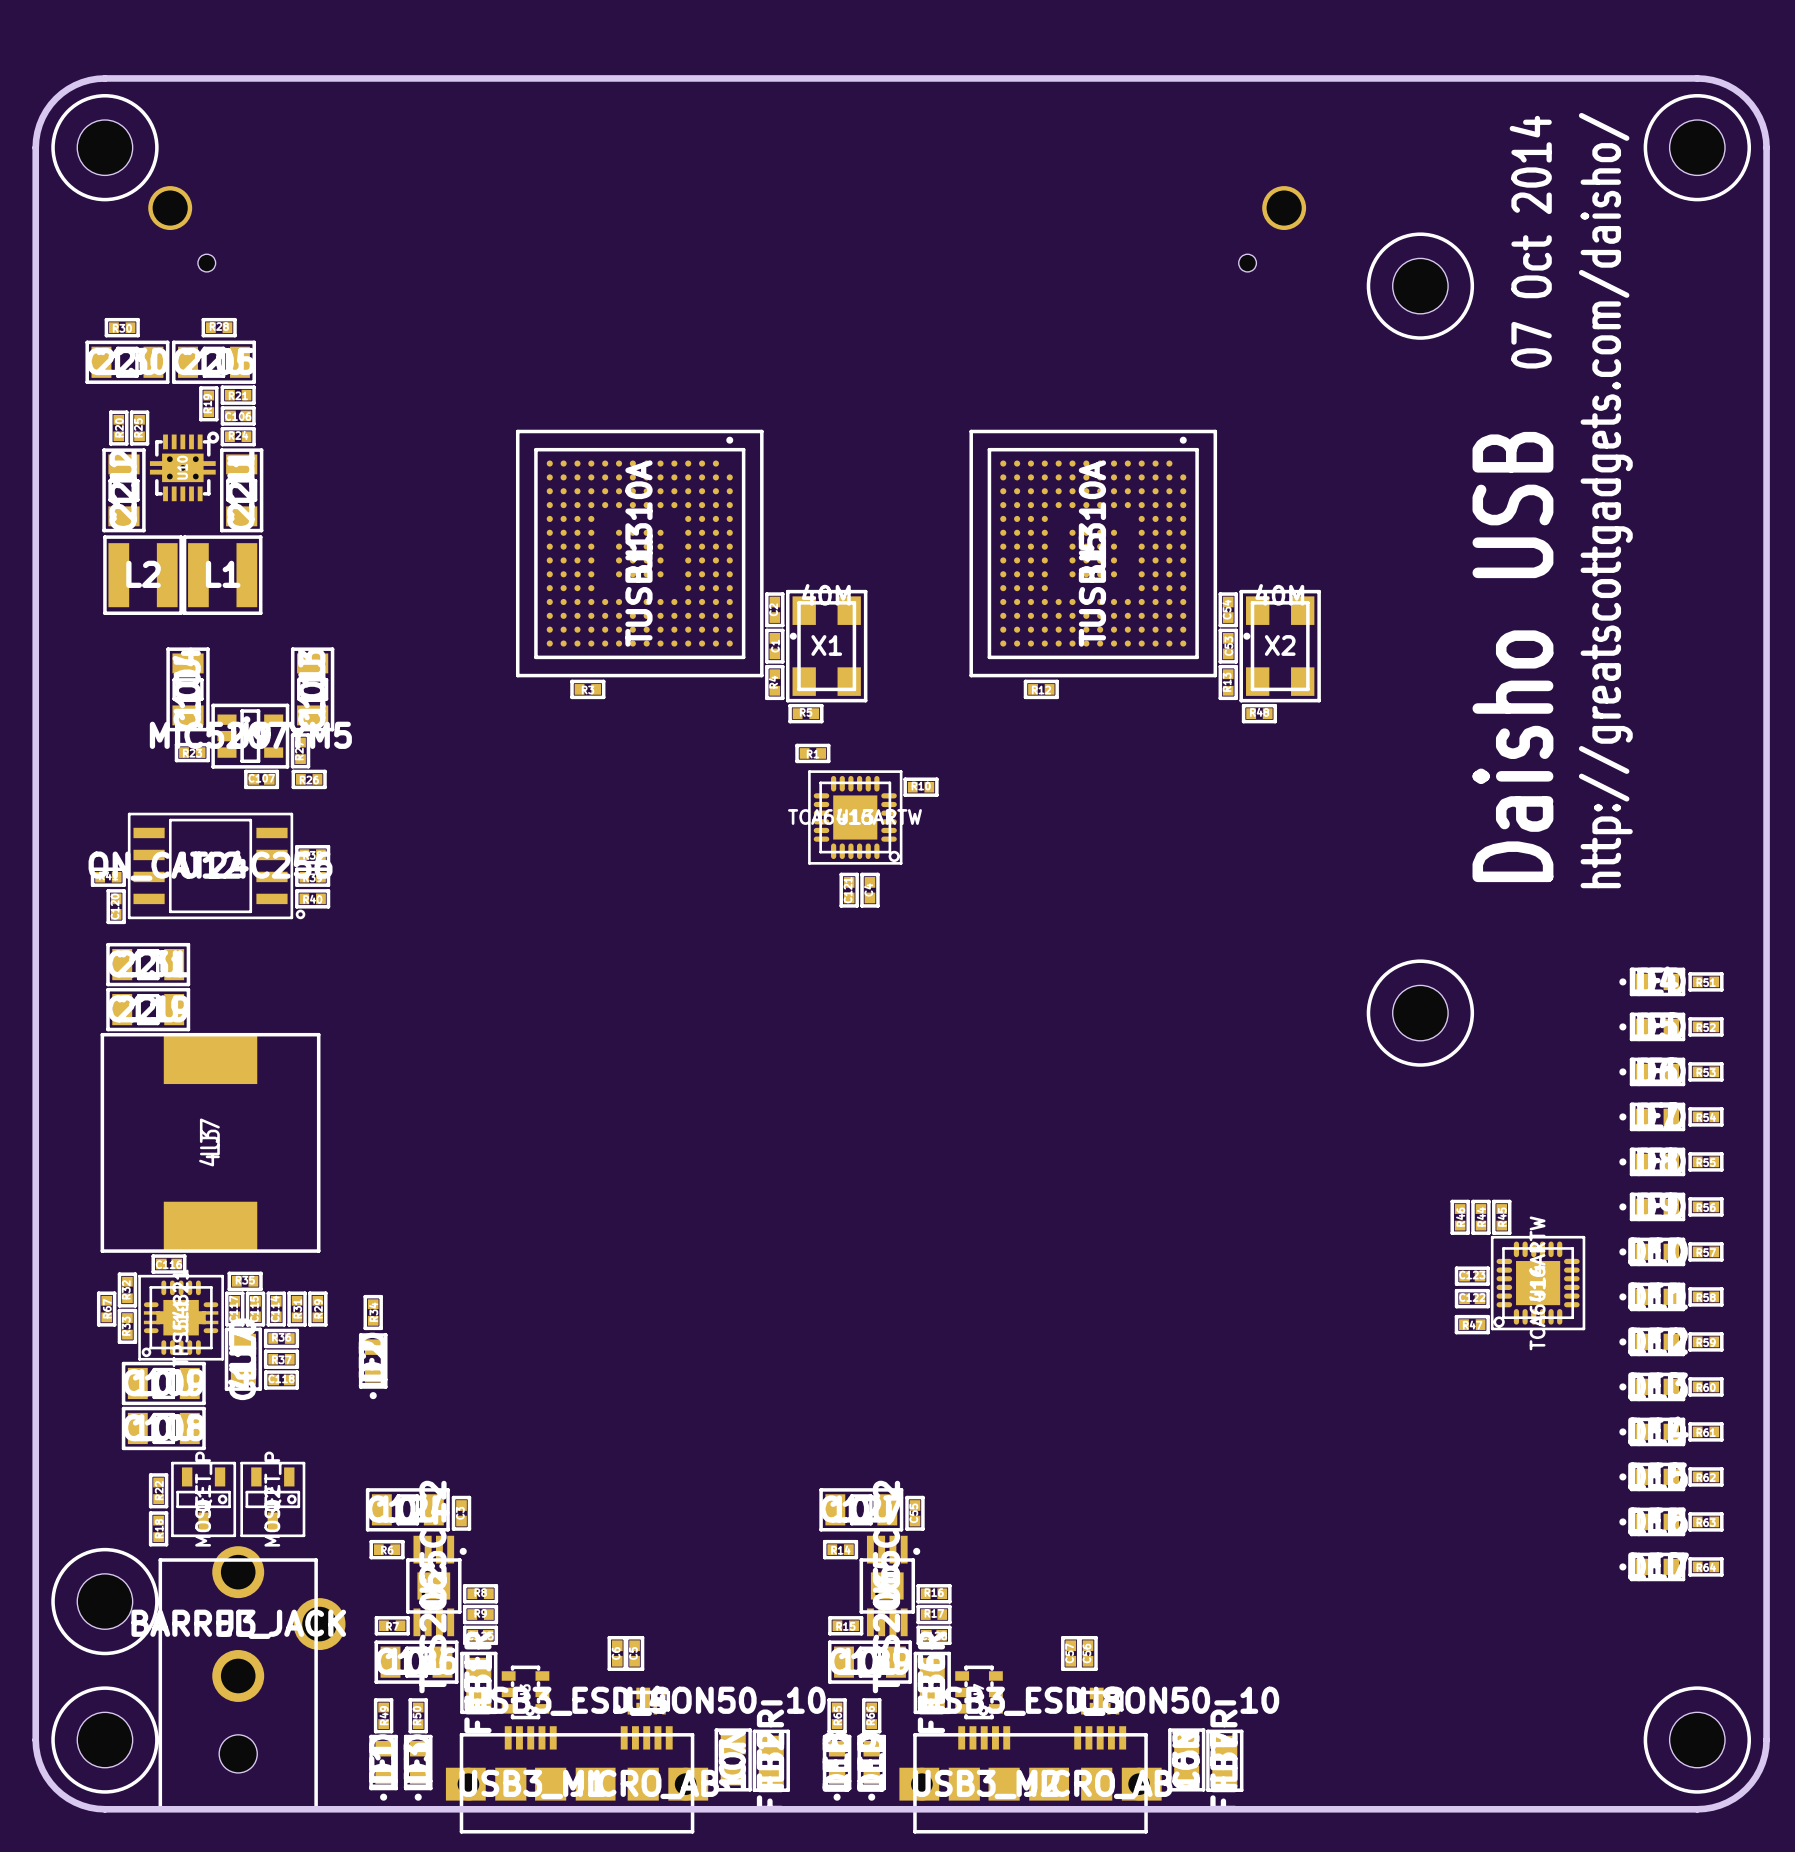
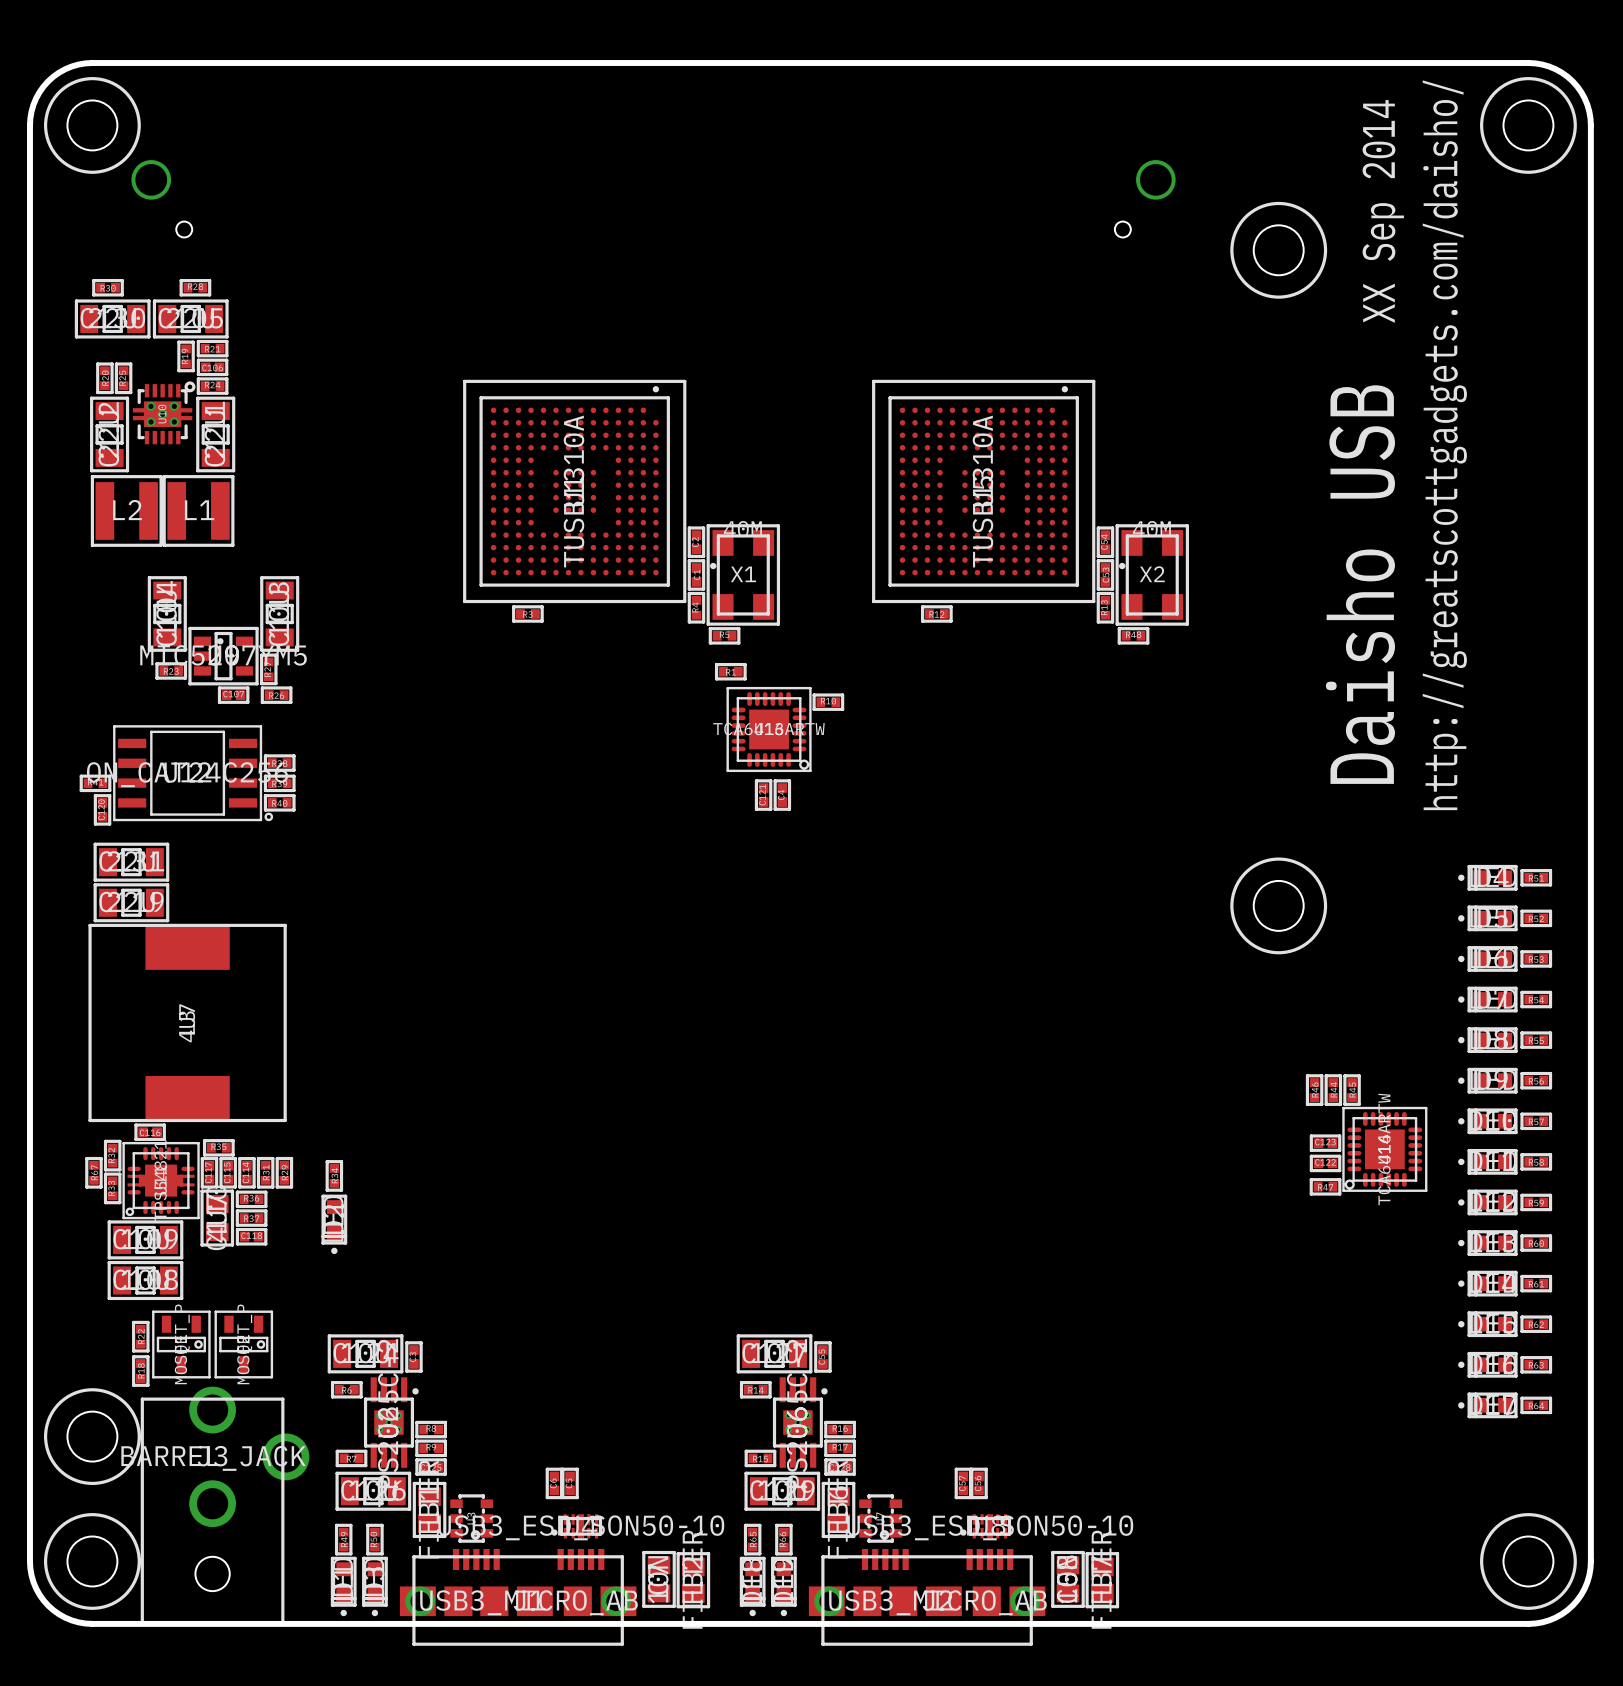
text: 07 Oct 2014 (1530, 242) -> XX Sep 2014 (1383, 211)

